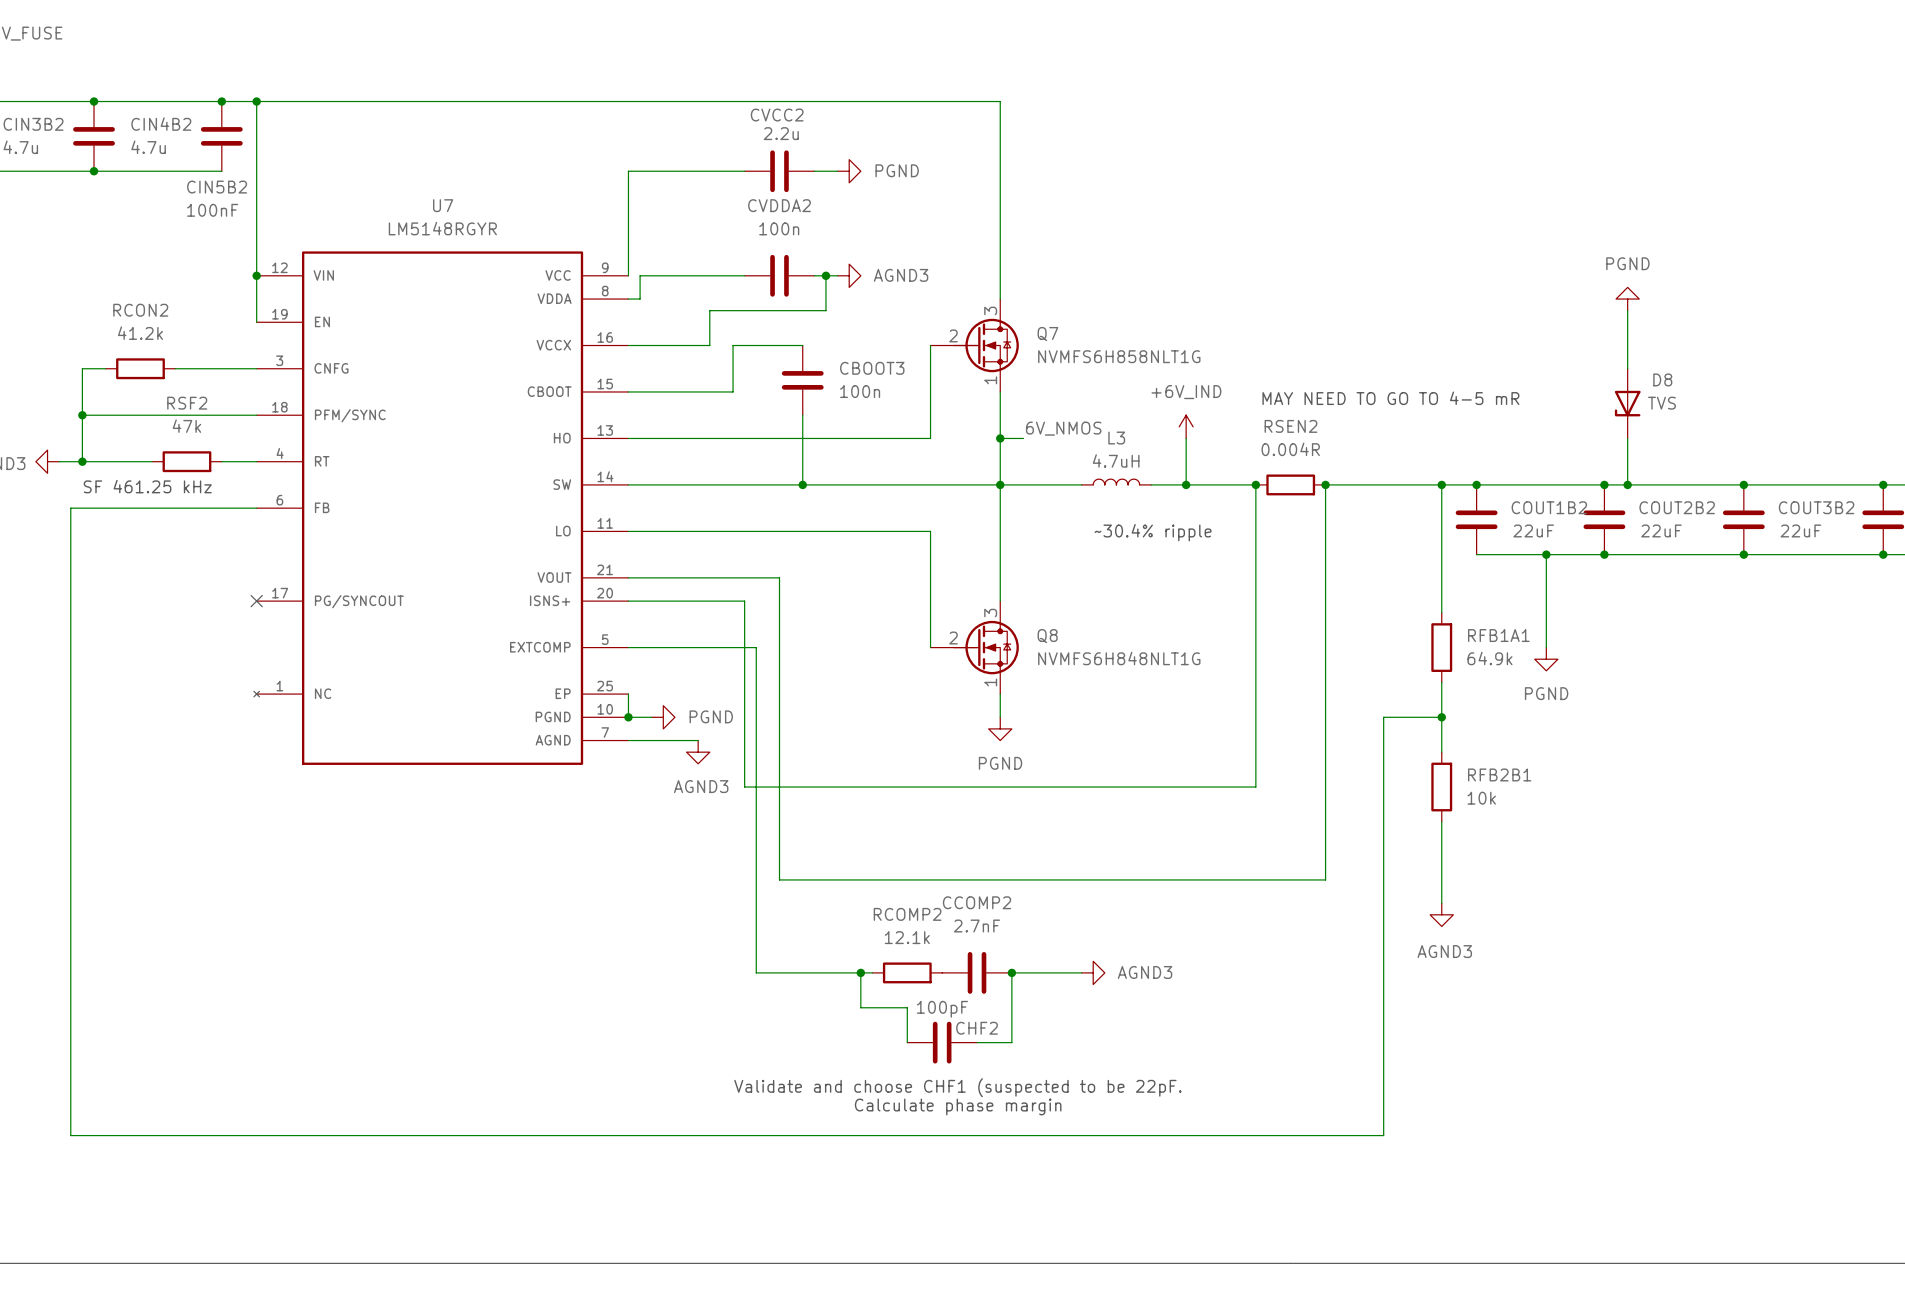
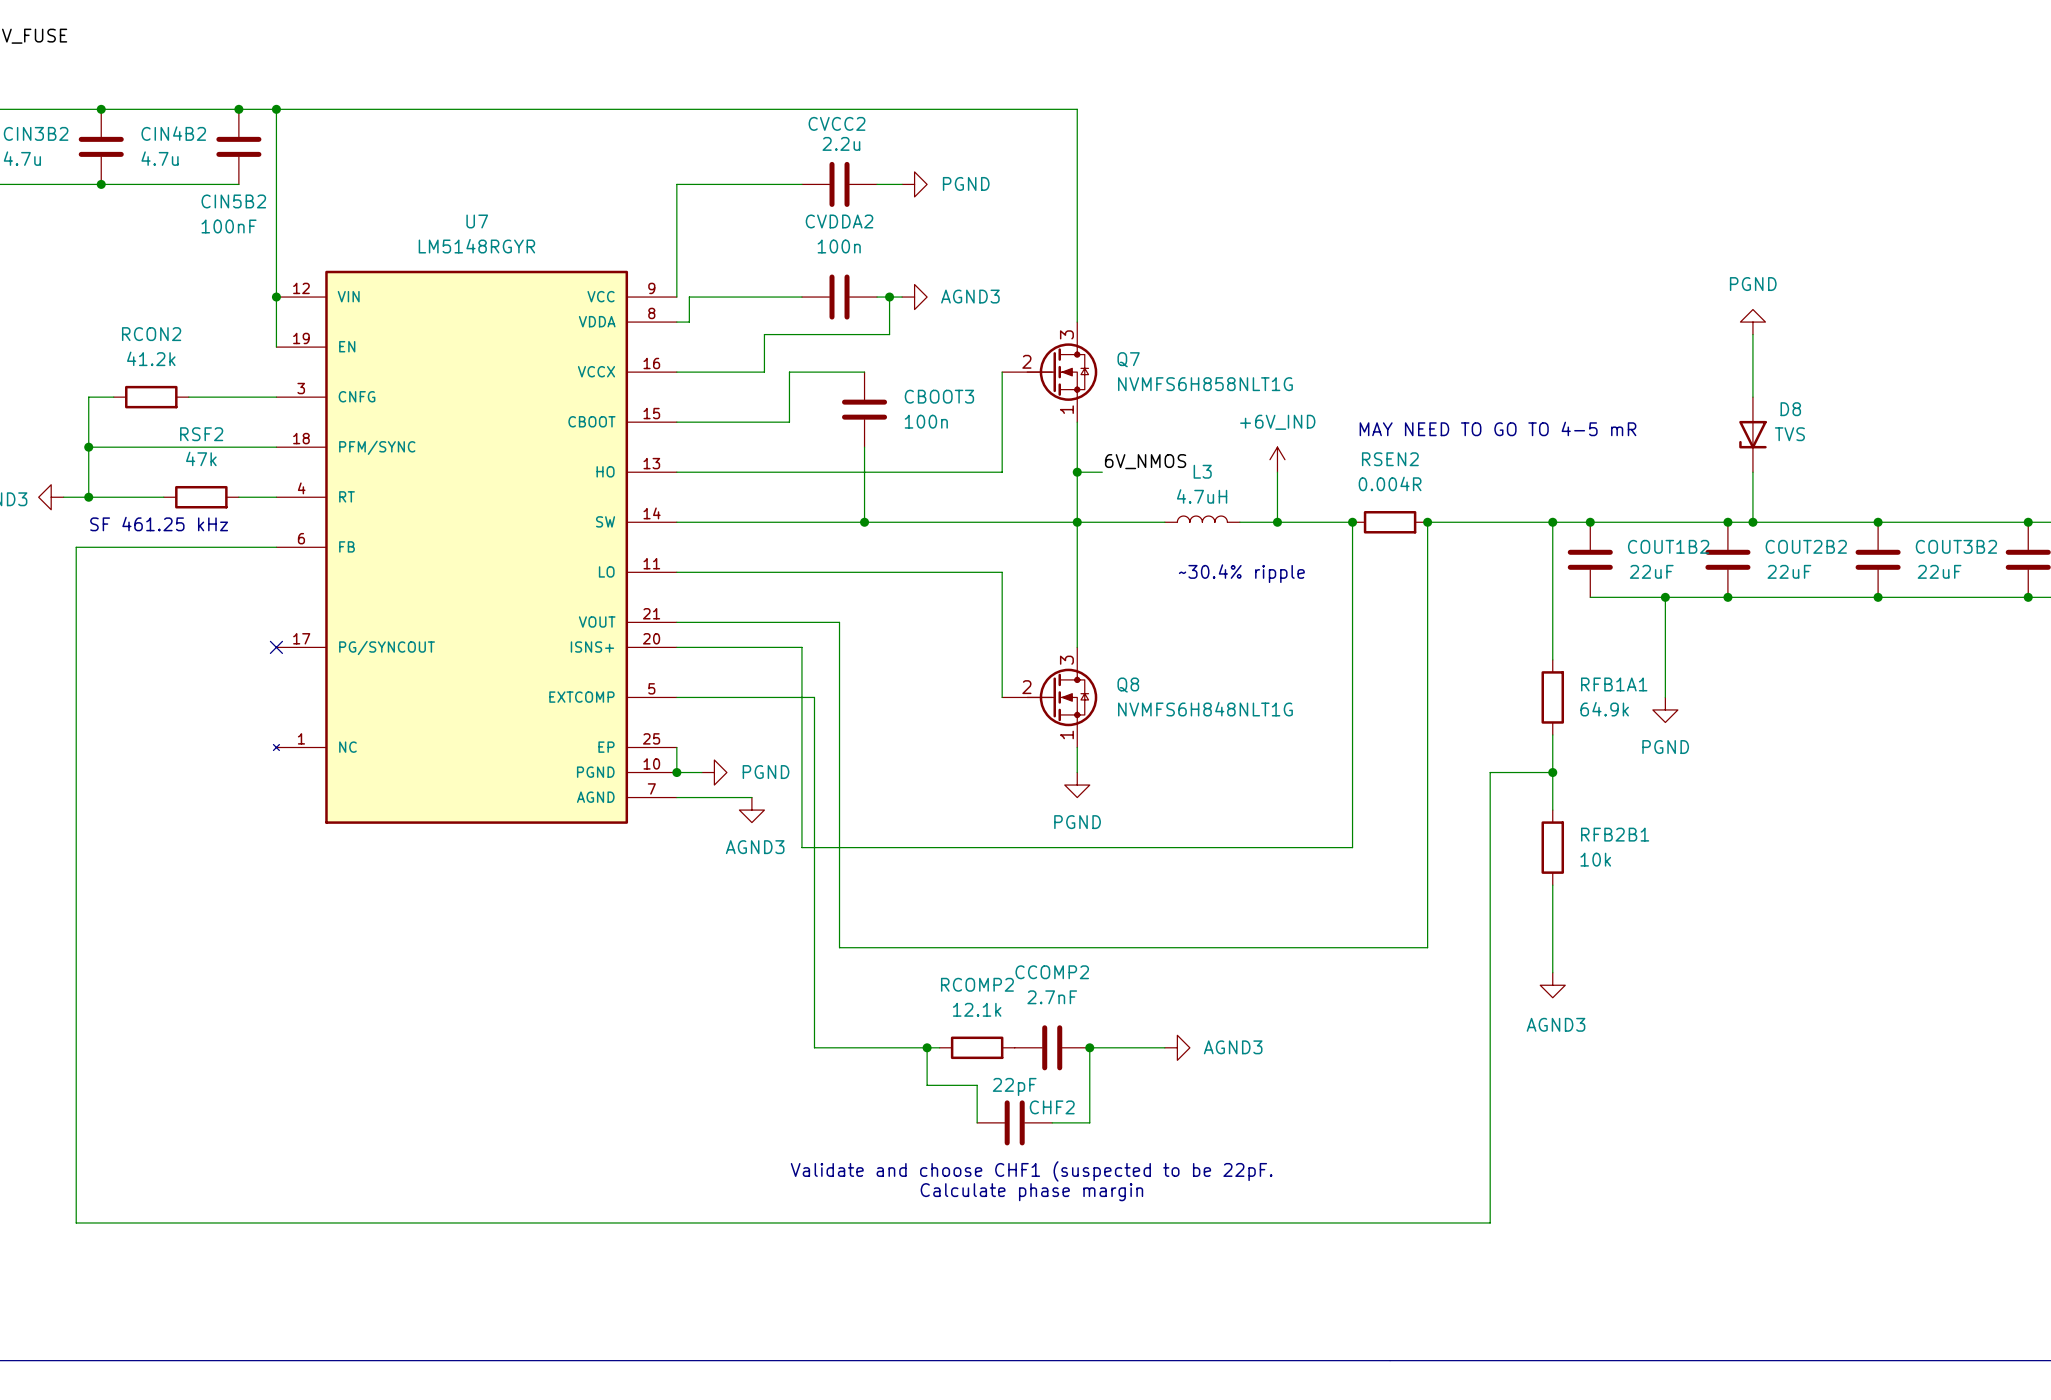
CHF2 value: 100pF (942, 1009) -> 22pF (1014, 1086)

